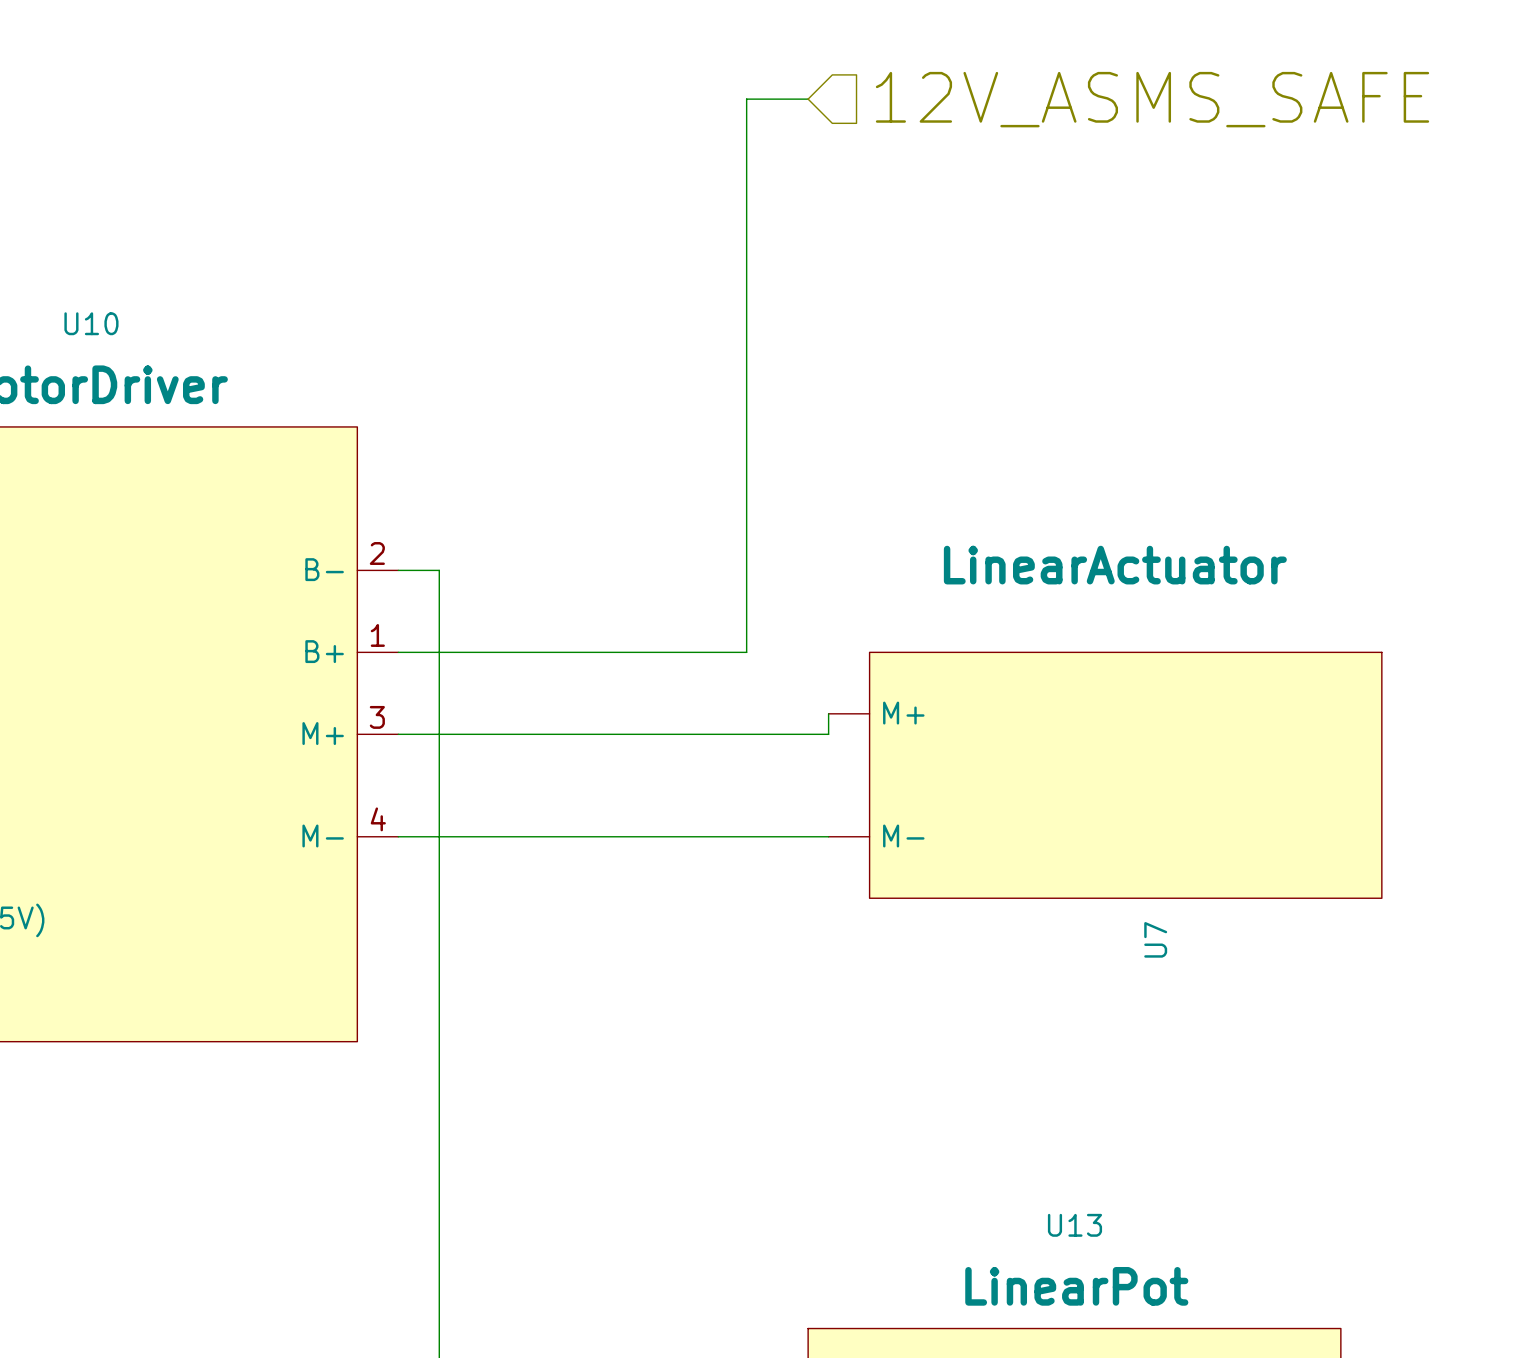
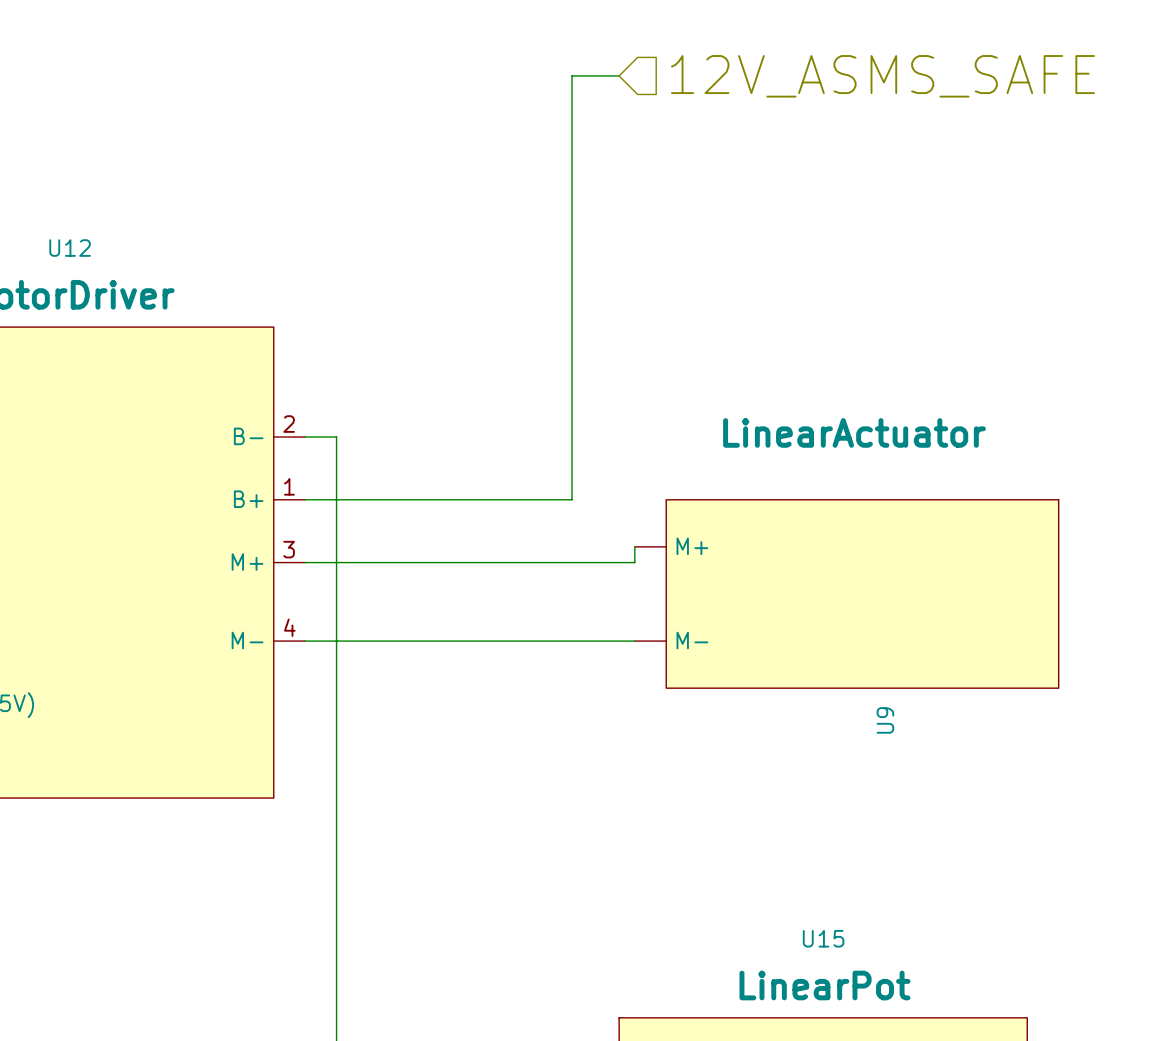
U10 name: U10 (91, 323) -> U12 (70, 248)
U7 name: U7 (1155, 939) -> U9 (885, 720)
U13 name: U13 (1074, 1225) -> U15 (823, 938)

